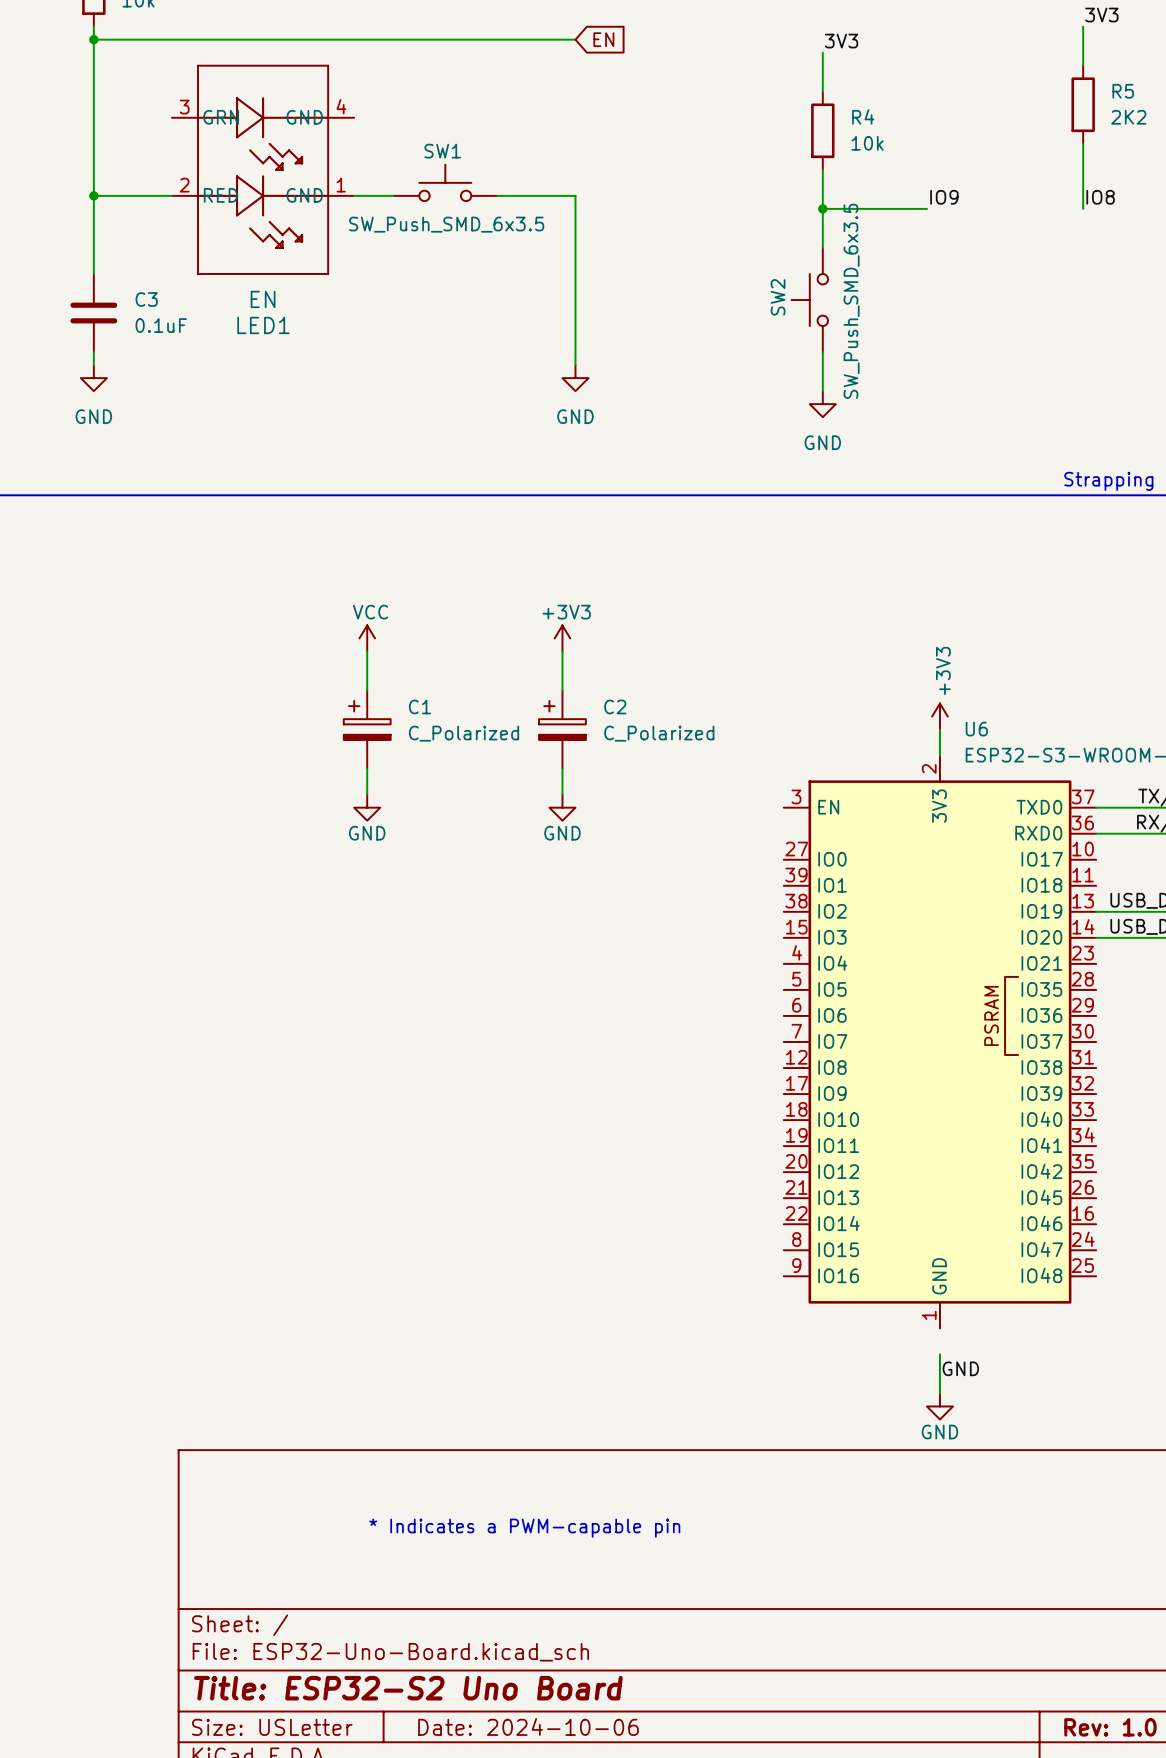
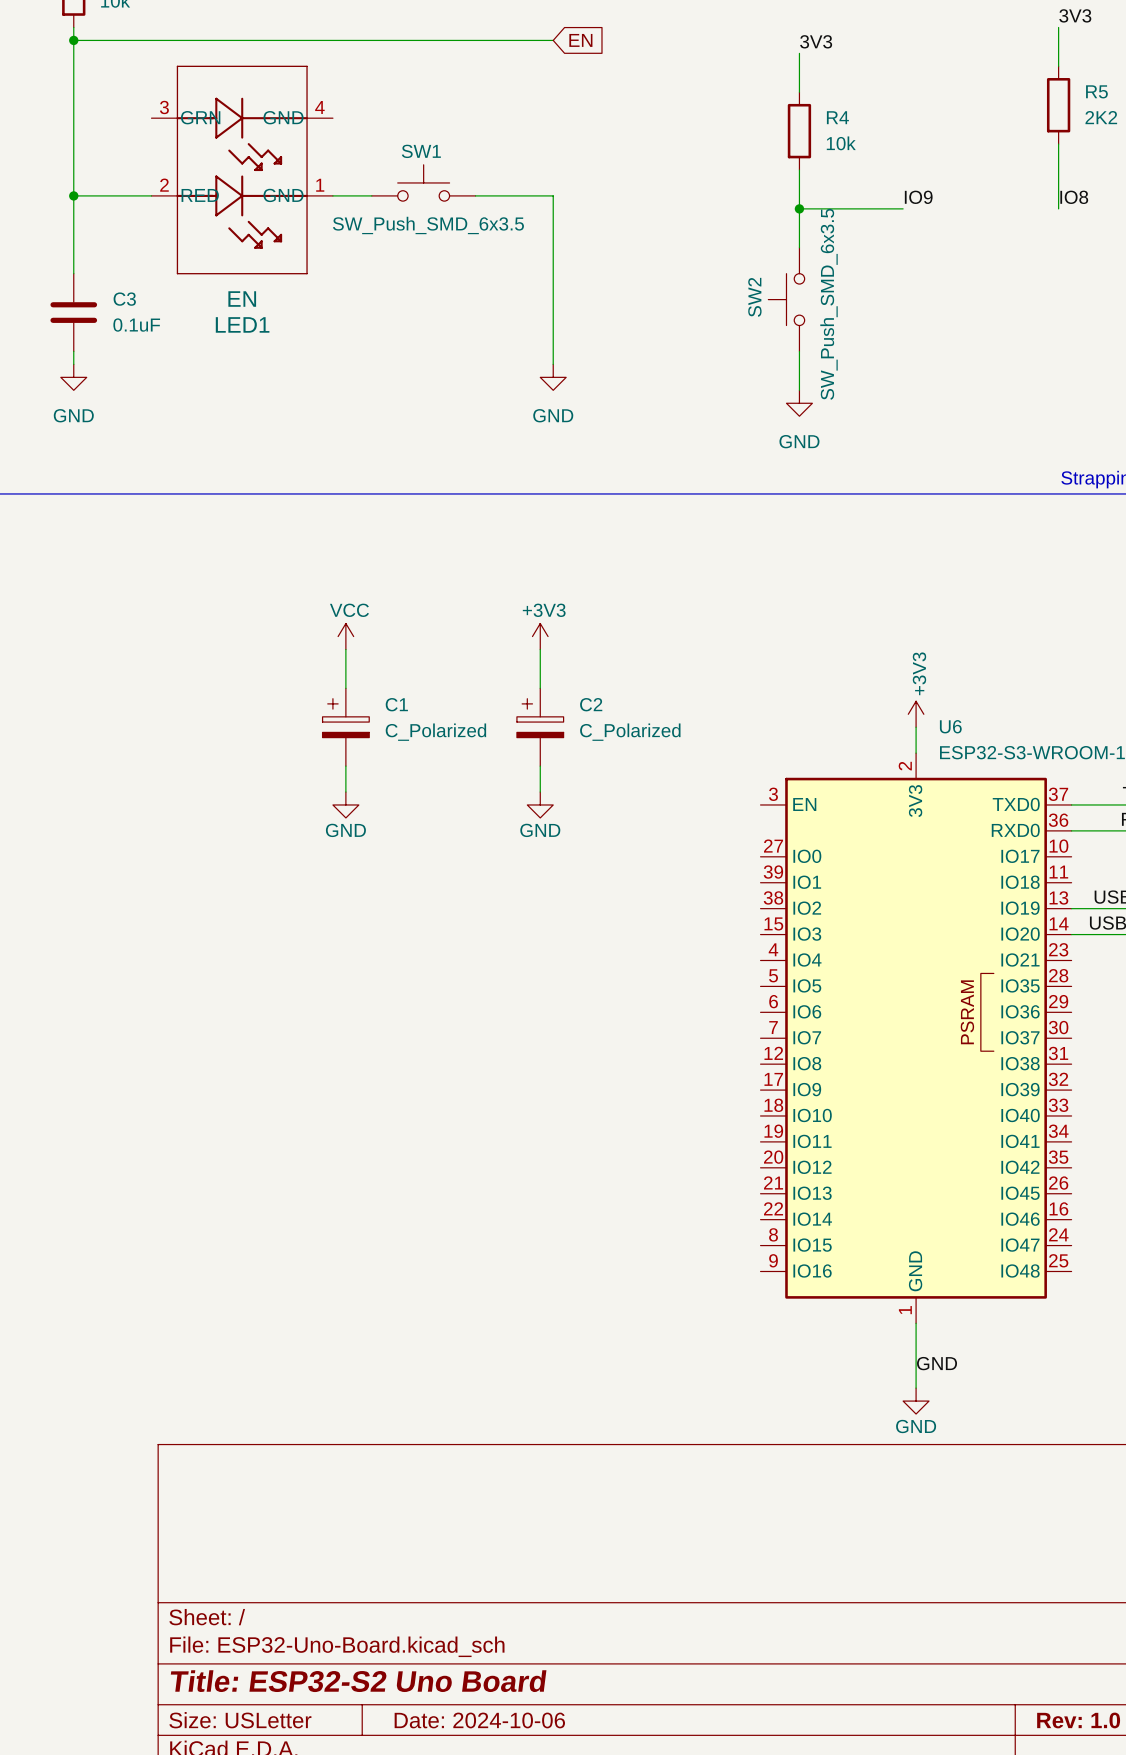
wire: none -> (916, 1323) (916, 1349)
text: * Indicates a PWM-capable pin (524, 1528) -> none

